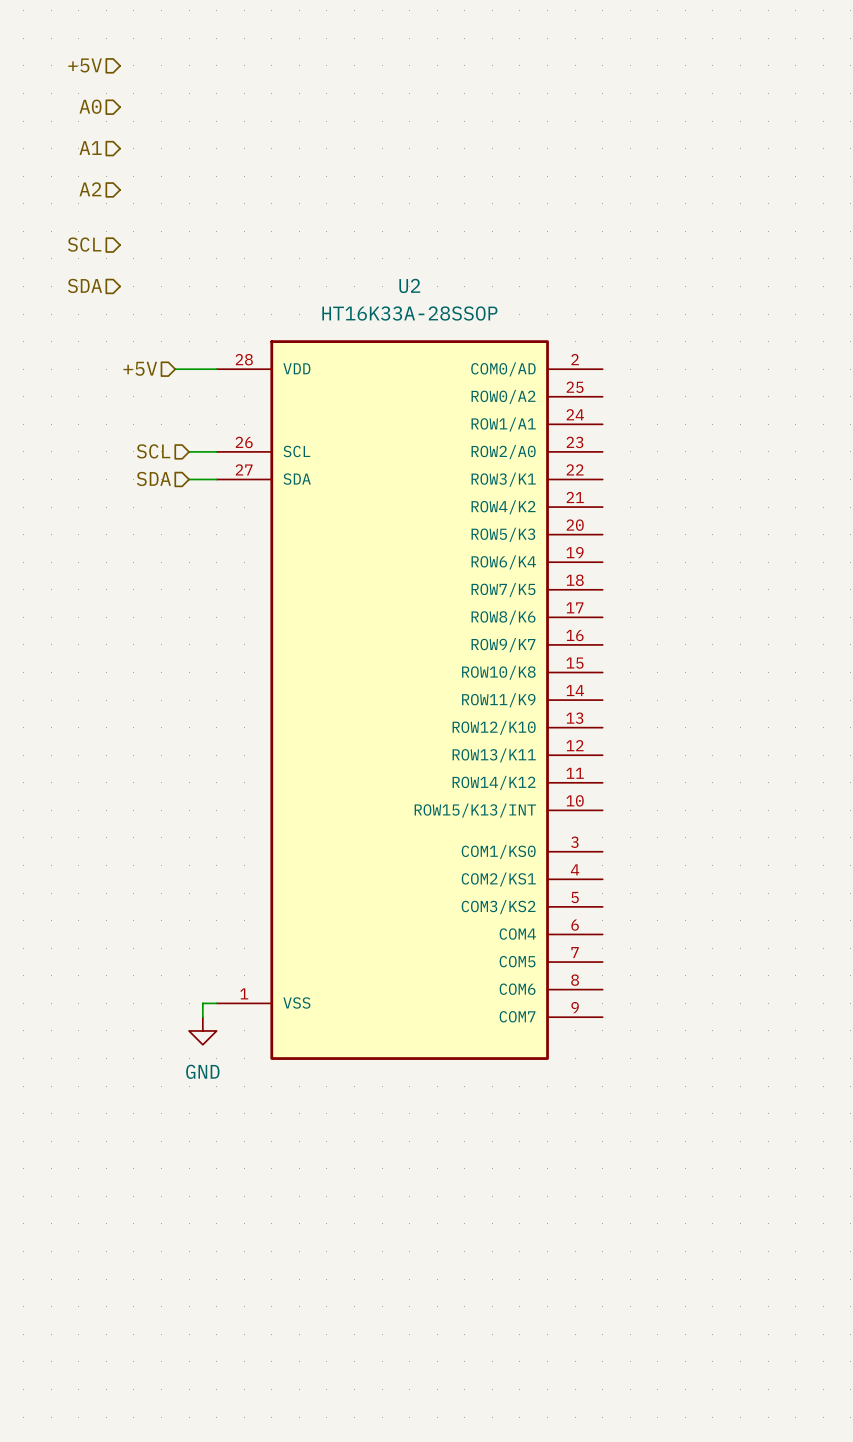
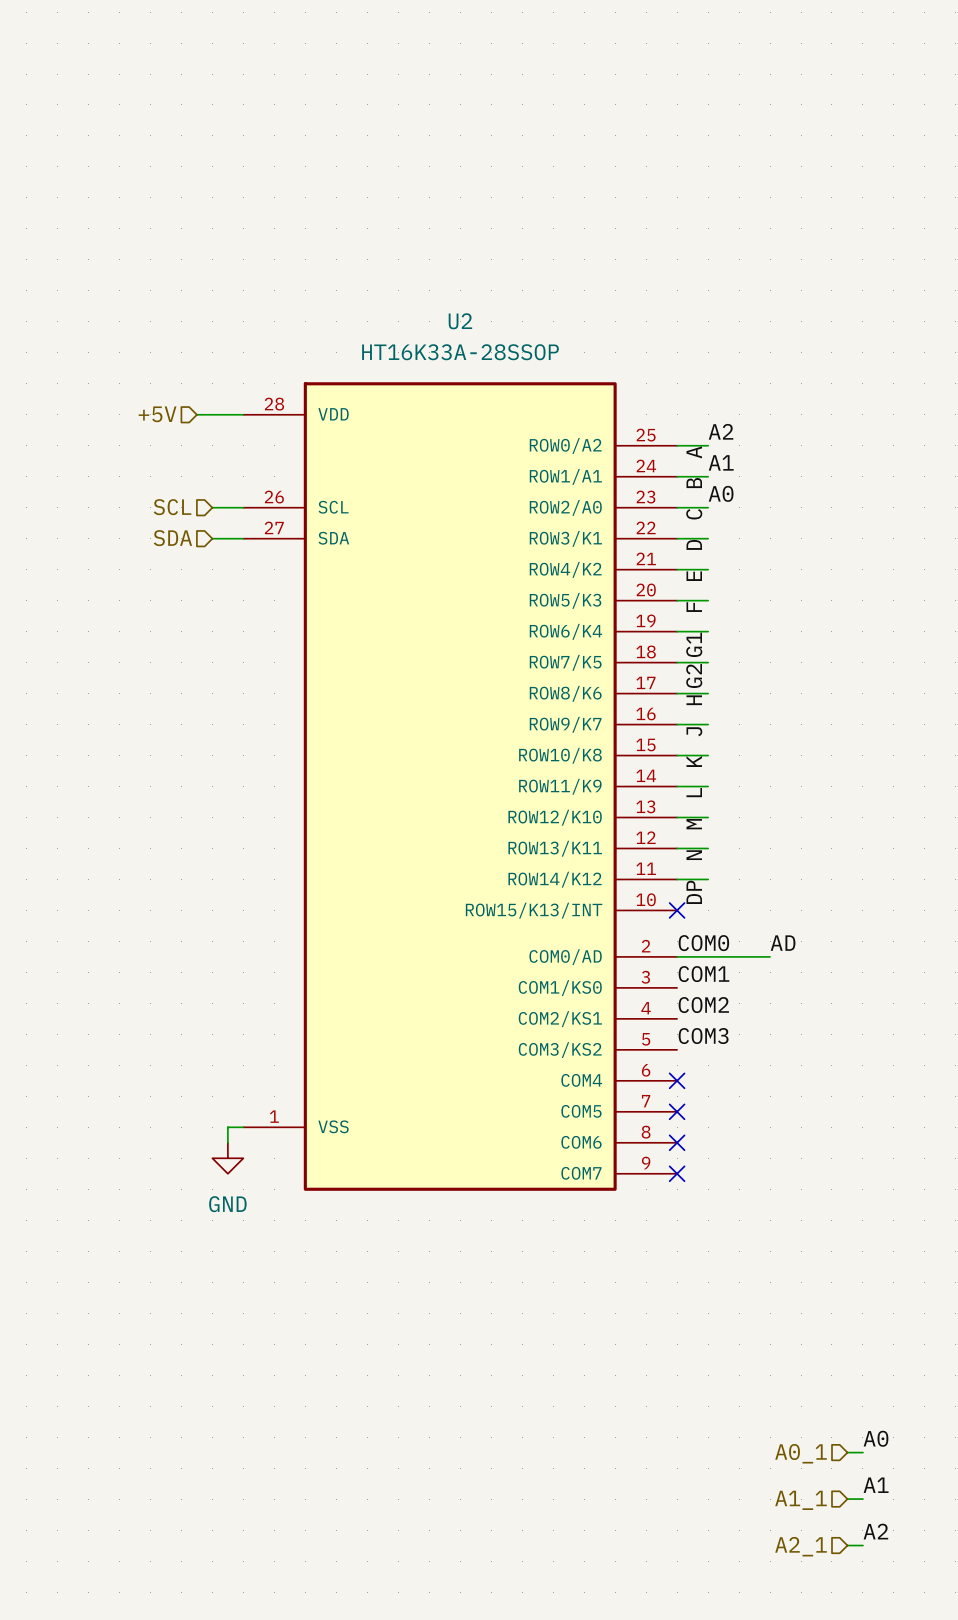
hierarchical label: +5V (85, 65) -> none
hierarchical label: A0 (90, 106) -> none
hierarchical label: A1 (90, 148) -> none
hierarchical label: A2 (90, 189) -> none
hierarchical label: SCL (84, 244) -> none
hierarchical label: SDA (84, 285) -> none
U2 symbol: [216, 340, 603, 1060] -> [243, 382, 678, 1191]
label: none -> A2 (721, 431)
wire: none -> (677, 445) (708, 445)
label: none -> A (694, 452)
label: none -> A1 (721, 462)
wire: none -> (677, 476) (708, 476)
label: none -> B (694, 483)
label: none -> A0 (721, 493)
wire: none -> (677, 507) (708, 507)
label: none -> C (694, 514)
wire: none -> (677, 538) (708, 538)
label: none -> D (694, 544)
wire: none -> (677, 569) (708, 569)
label: none -> E (694, 576)
wire: none -> (677, 600) (708, 600)
label: none -> F (694, 607)
wire: none -> (677, 631) (708, 631)
label: none -> G1 (694, 644)
wire: none -> (677, 662) (708, 662)
label: none -> G2 (694, 676)
wire: none -> (677, 693) (708, 693)
label: none -> H (694, 700)
wire: none -> (677, 724) (708, 724)
label: none -> J (694, 731)
wire: none -> (677, 755) (708, 755)
label: none -> K (694, 761)
wire: none -> (677, 786) (708, 786)
label: none -> L (694, 792)
wire: none -> (677, 817) (708, 817)
label: none -> M (694, 824)
wire: none -> (677, 848) (708, 848)
label: none -> N (694, 855)
wire: none -> (677, 879) (708, 879)
label: none -> DP (694, 892)
no-connect mark: none -> (677, 910)
label: none -> COM0 (703, 943)
label: none -> AD (783, 943)
wire: none -> (677, 956) (770, 956)
label: none -> COM1 (703, 974)
label: none -> COM2 (703, 1005)
label: none -> COM3 (703, 1036)
no-connect mark: none -> (677, 1080)
no-connect mark: none -> (677, 1111)
no-connect mark: none -> (677, 1142)
no-connect mark: none -> (677, 1173)
label: none -> A0 (876, 1438)
wire: none -> (847, 1452) (862, 1452)
hierarchical label: none -> A0_1 (801, 1453)
label: none -> A1 (876, 1485)
wire: none -> (847, 1499) (862, 1499)
hierarchical label: none -> A1_1 (801, 1500)
label: none -> A2 (875, 1531)
wire: none -> (847, 1545) (862, 1545)
hierarchical label: none -> A2_1 (801, 1546)

